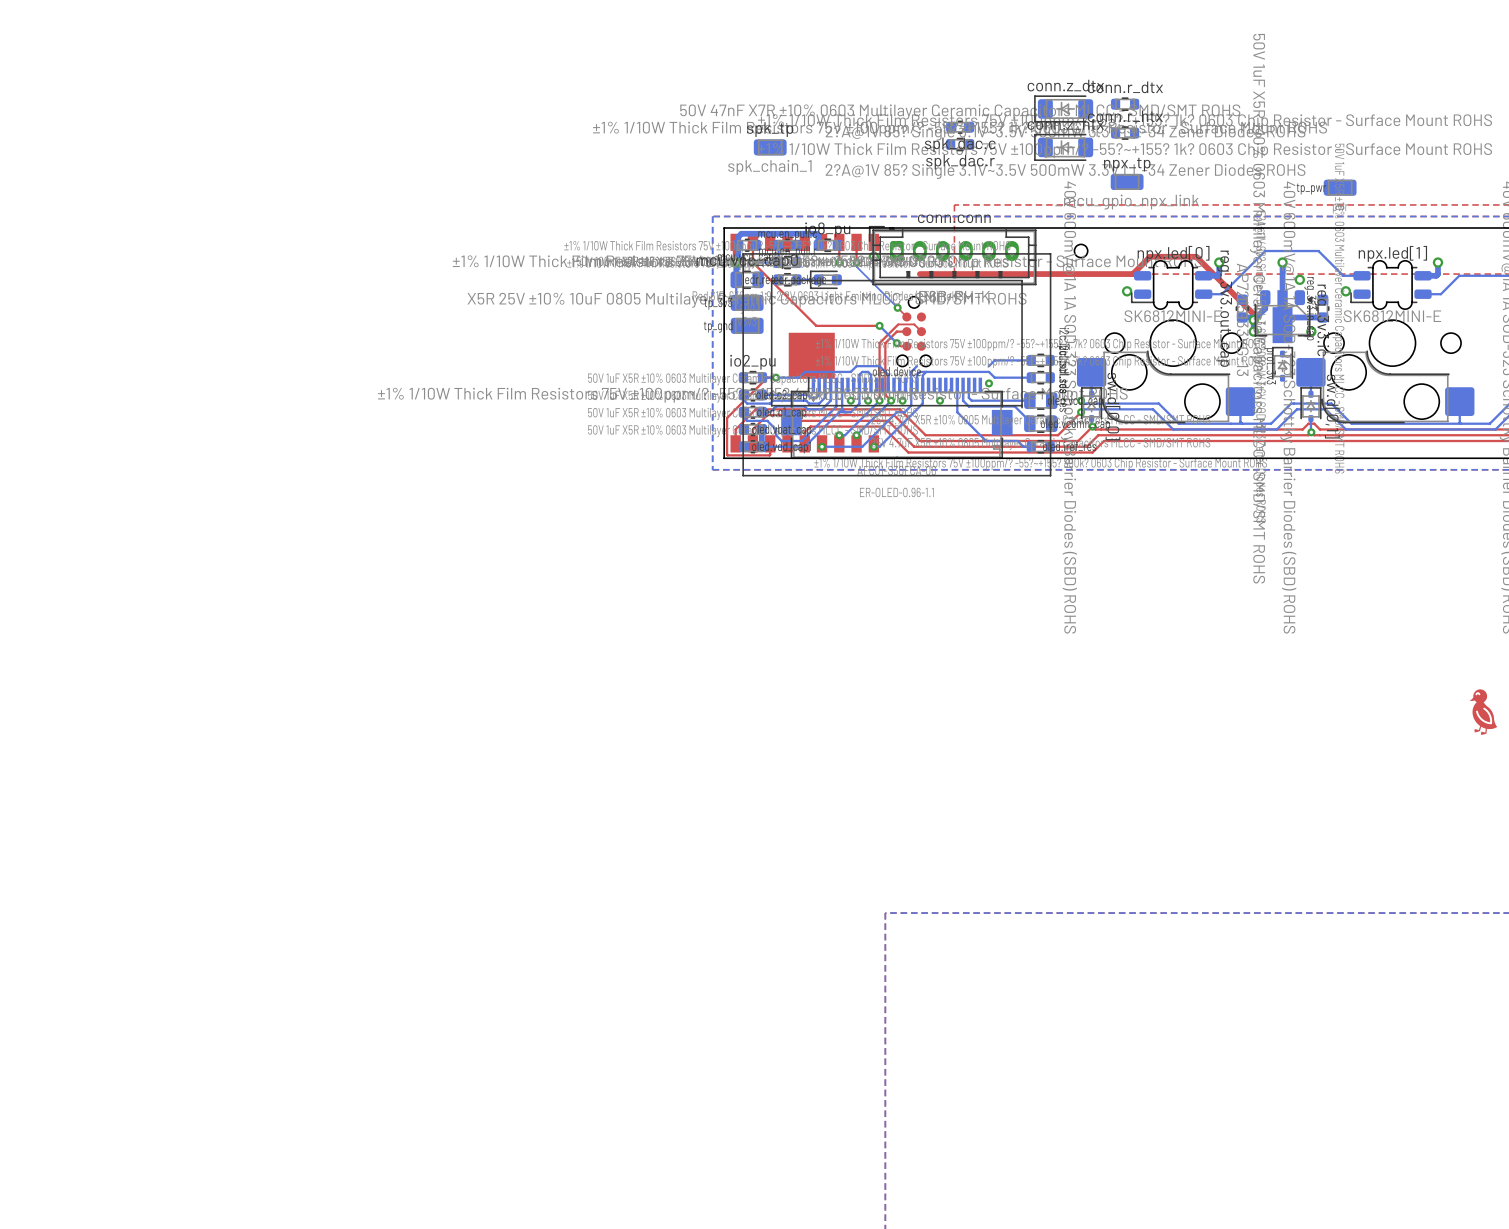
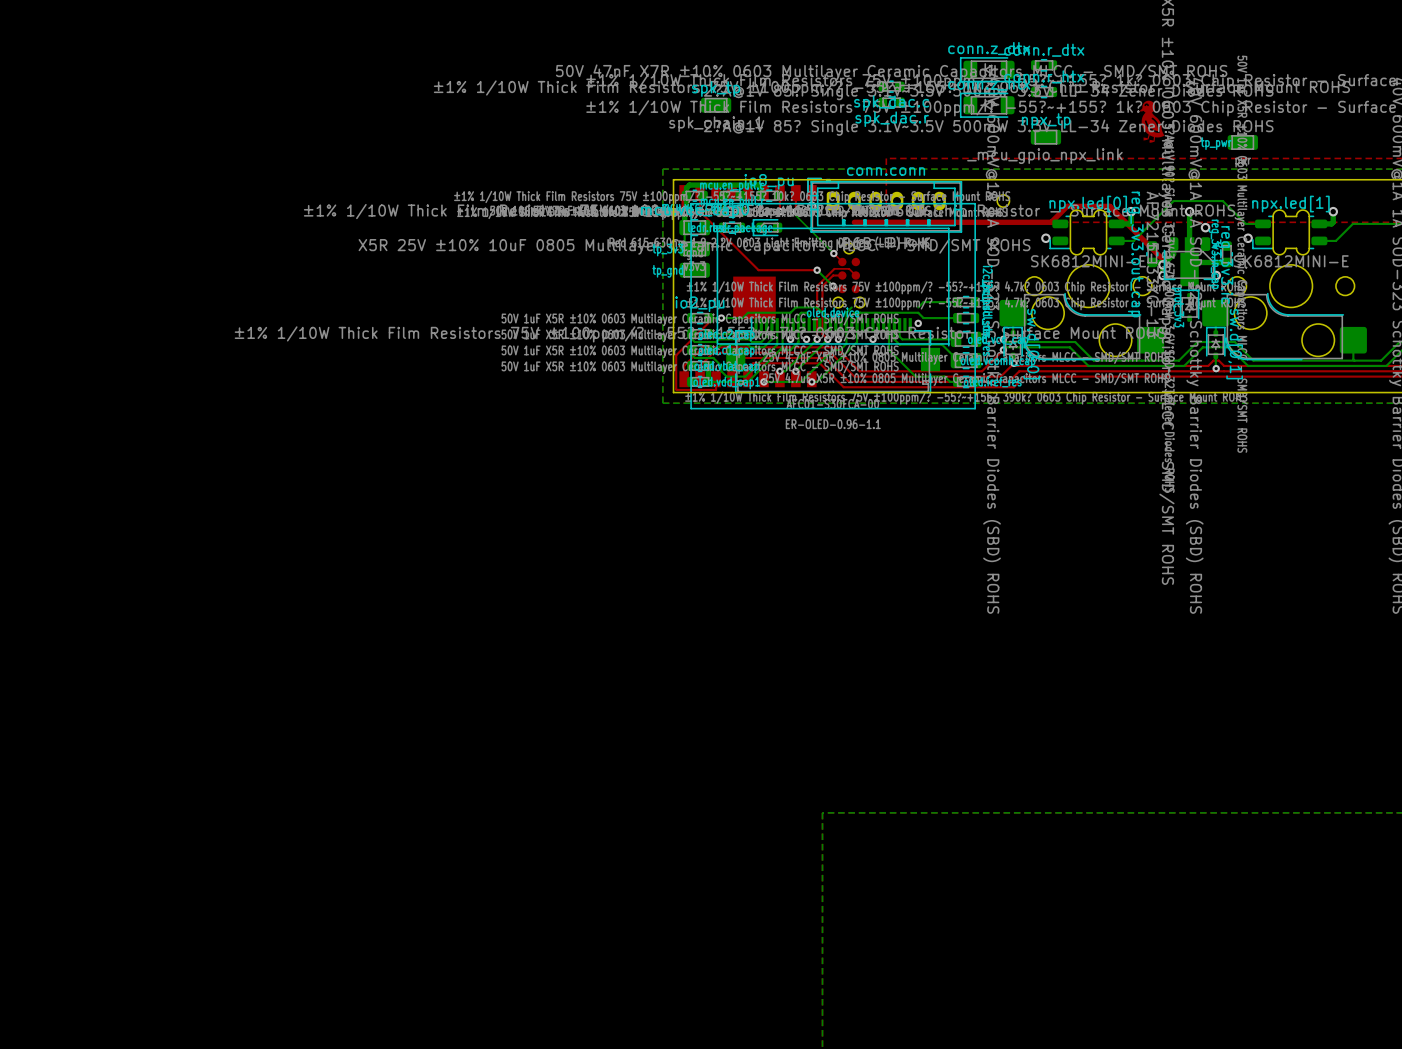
part: none -> (1151, 121)
part: (1483, 712) -> none

